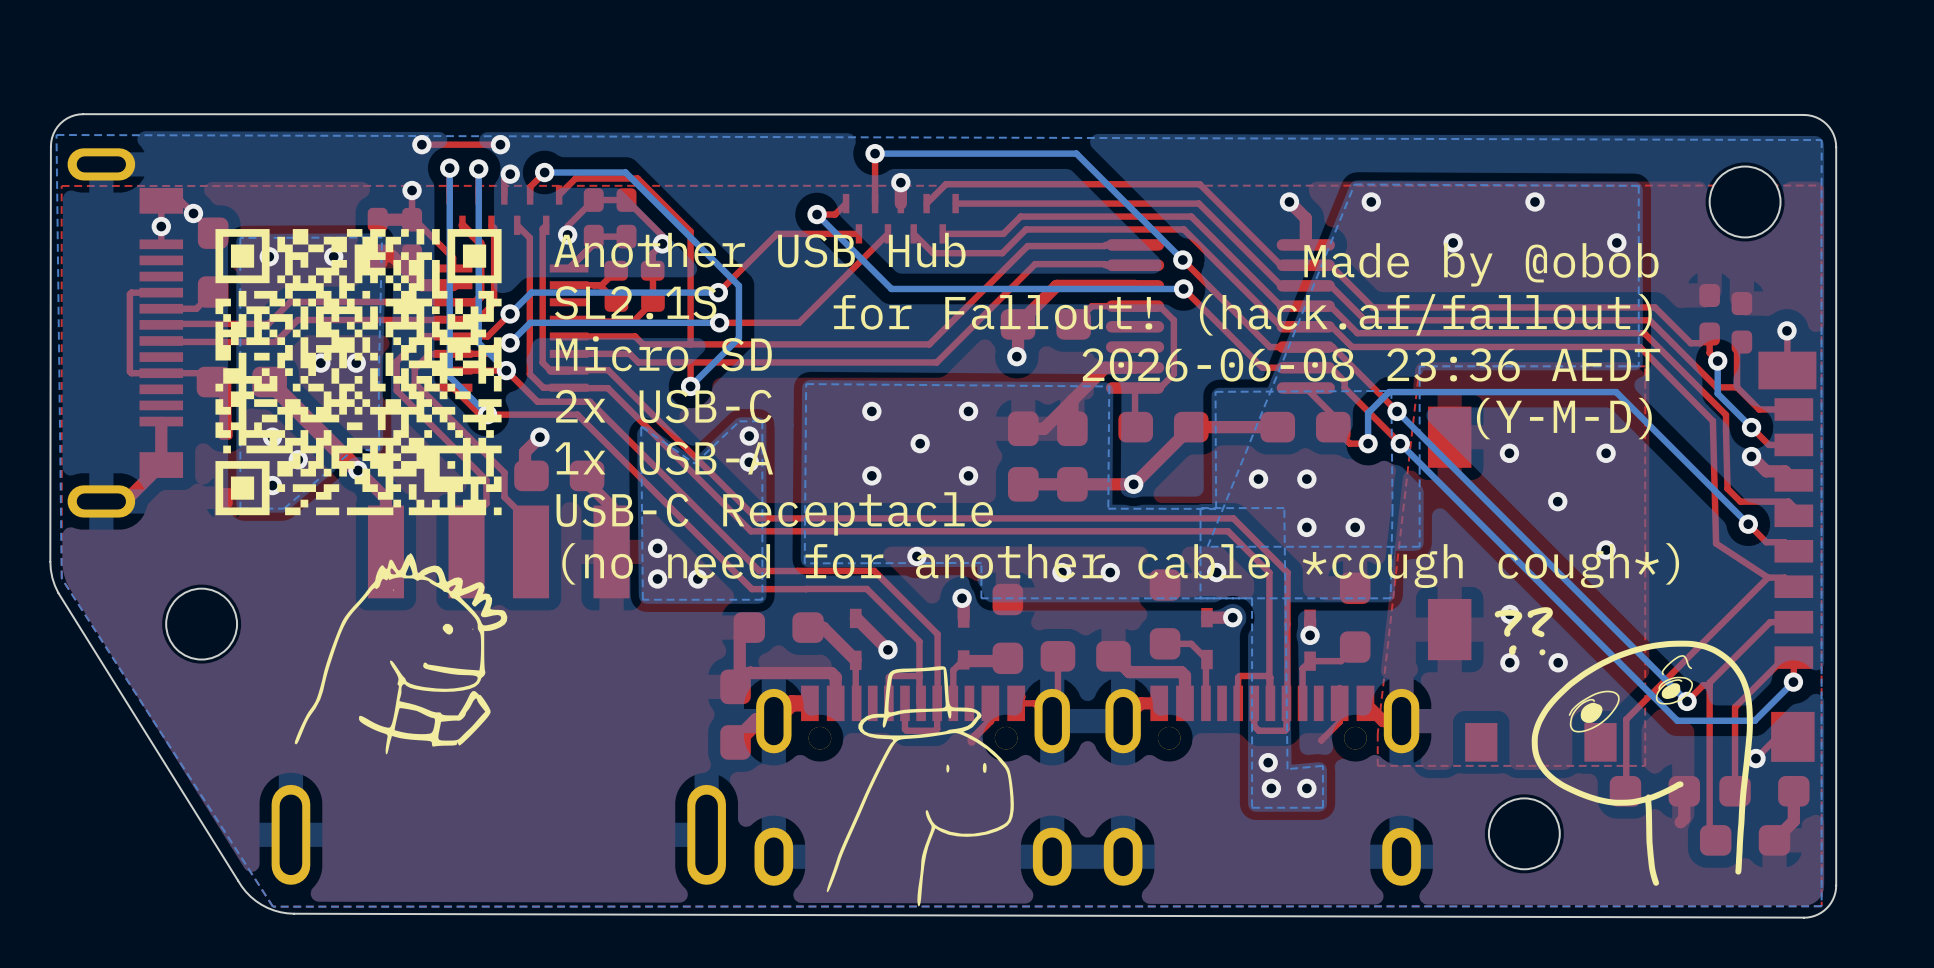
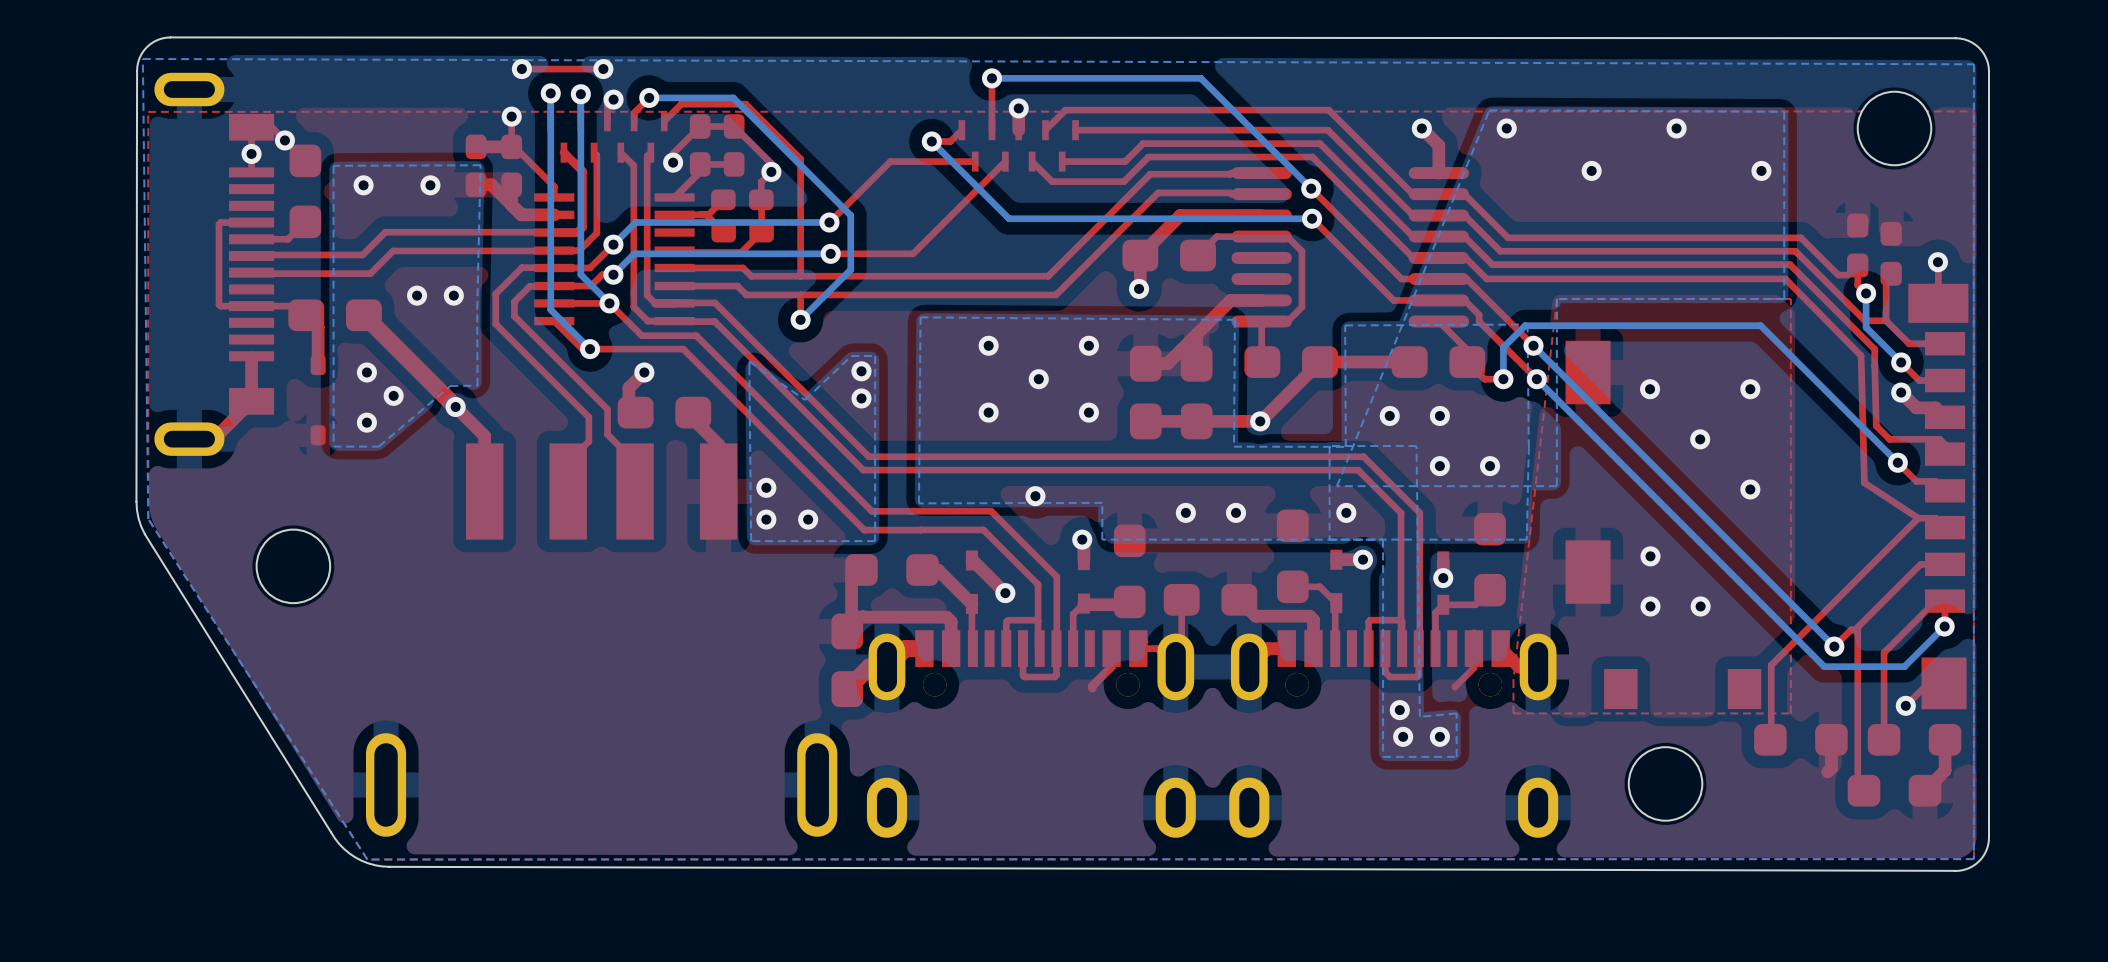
drawing: [215, 229, 508, 755] -> none
text: Another USB Hub (759, 250) -> none
text: Made by @obob (1481, 264) -> none
text: SL2.1S (635, 302) -> none
text: for Fallout! (hack.af/fallout) (1242, 314) -> none
text: Micro SD (663, 353) -> none
text: 2026-06-08 23:36 AEDT (1371, 364) -> none
text: 2x USB-C (663, 406) -> none
text: (Y-M-D) (1564, 418) -> none
text: 1x USB-A (664, 458) -> none
text: USB-C Receptacle (774, 513) -> none
text: (no need for another cable *cough cough*) (1120, 565) -> none
drawing: [1494, 607, 1753, 886] -> none
drawing: [826, 666, 1014, 907] -> none

